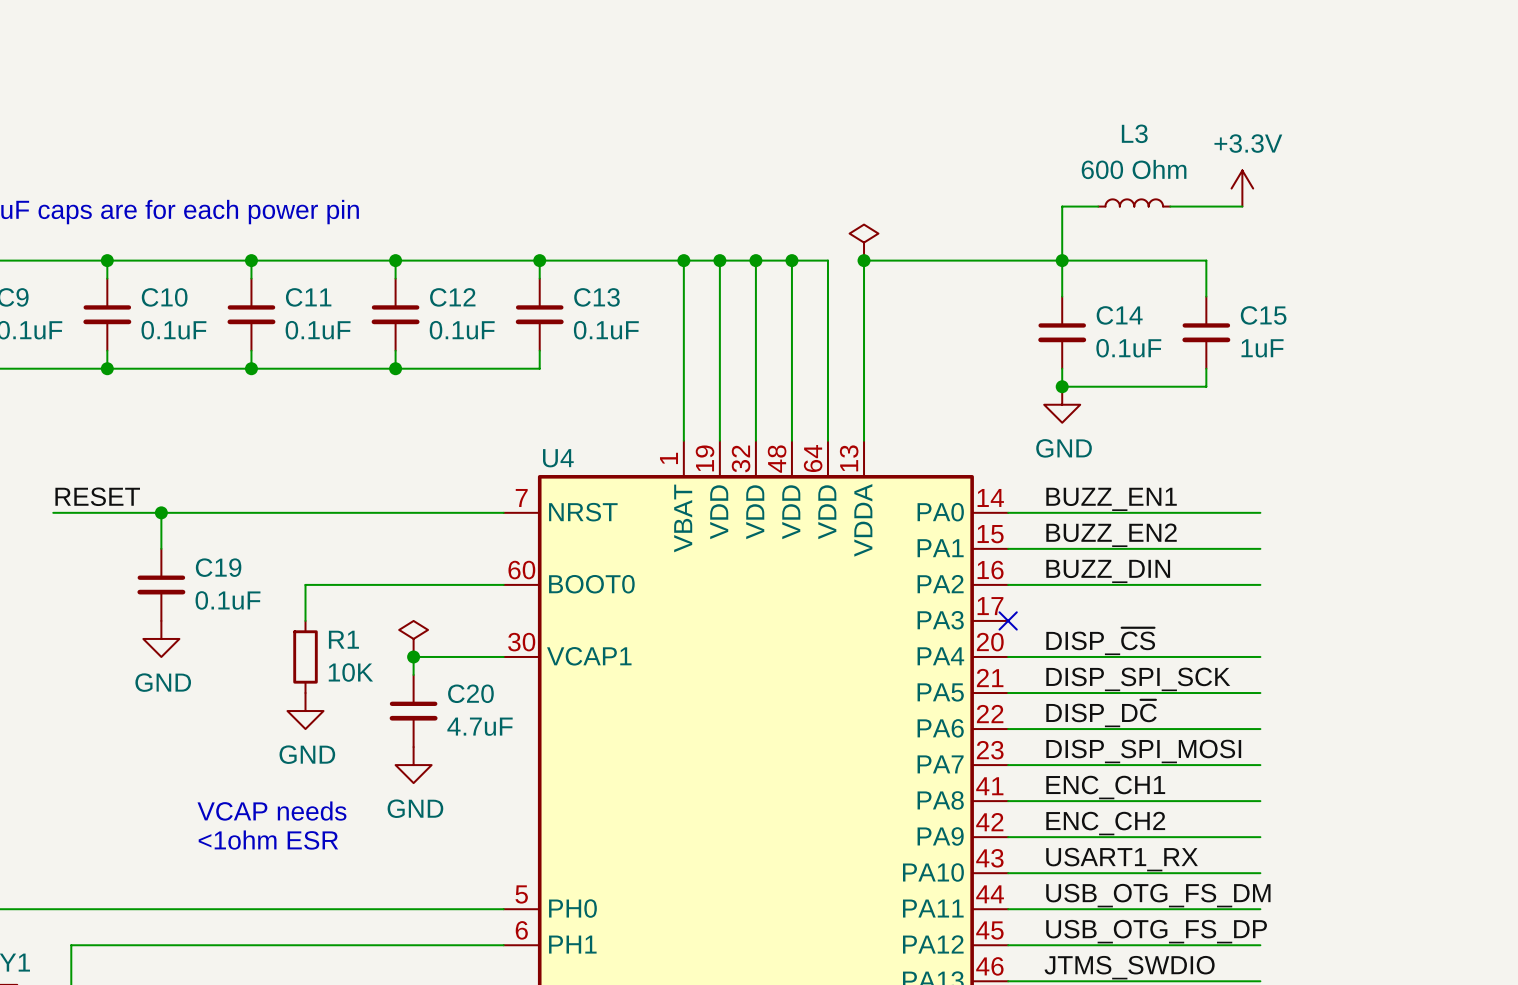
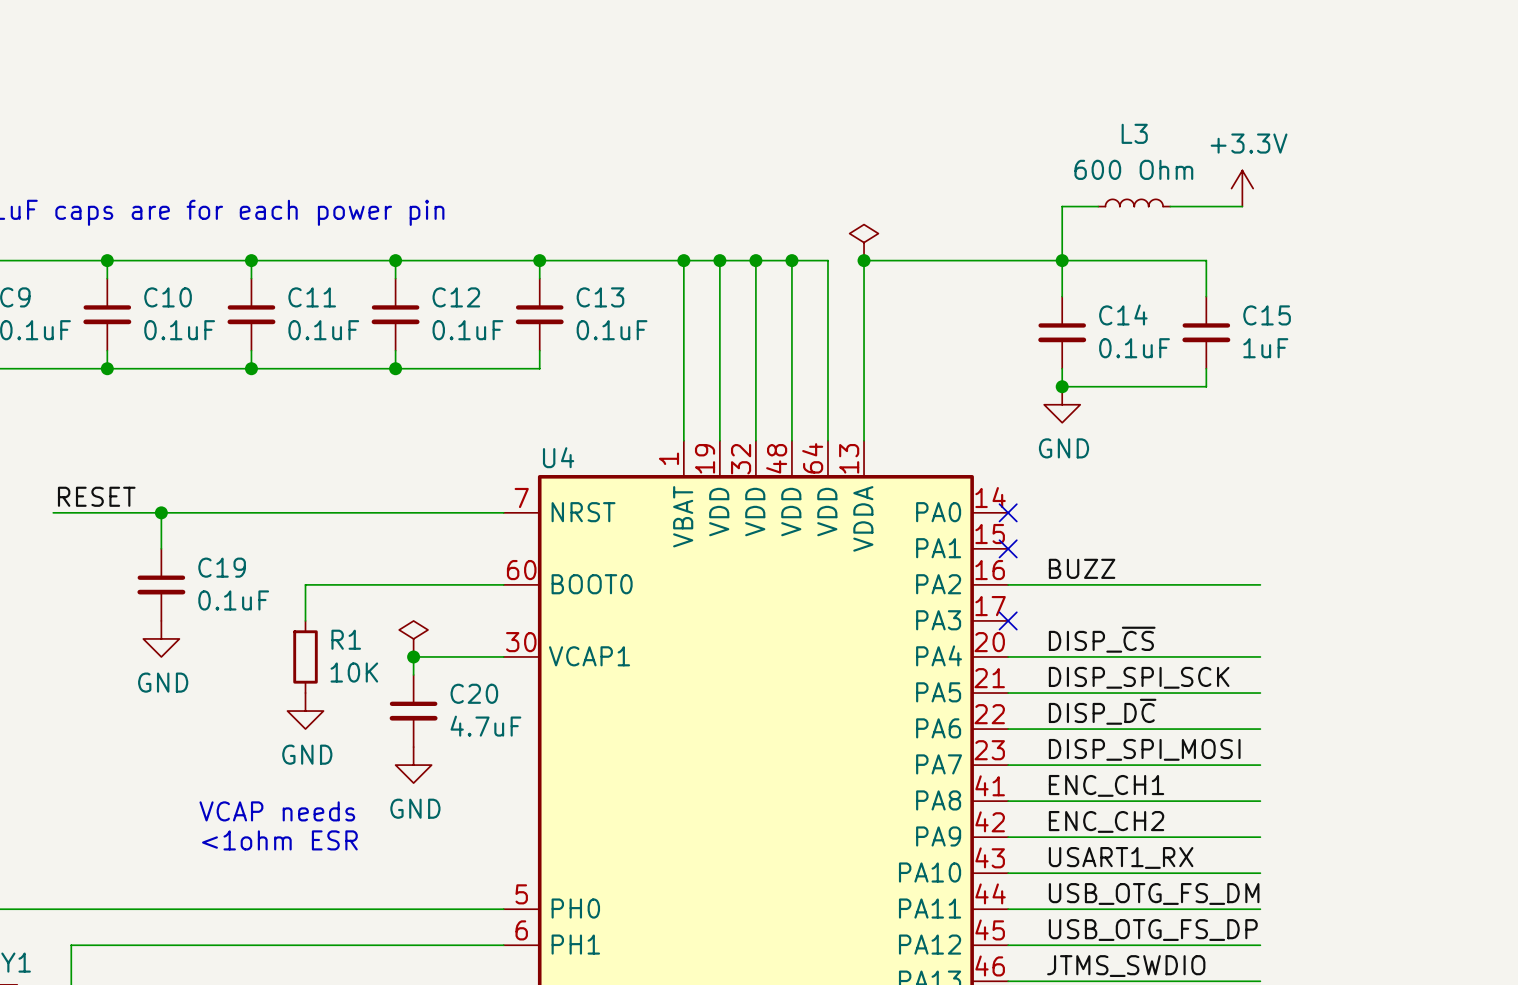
label: BUZZ_EN1 (1111, 499) -> none
wire: (1008, 512) (1260, 512) -> none
no-connect mark: none -> (1008, 512)
label: BUZZ_EN2 (1111, 535) -> none
wire: (1008, 548) (1260, 548) -> none
no-connect mark: none -> (1008, 548)
label: BUZZ_DIN (1108, 571) -> BUZZ (1082, 568)

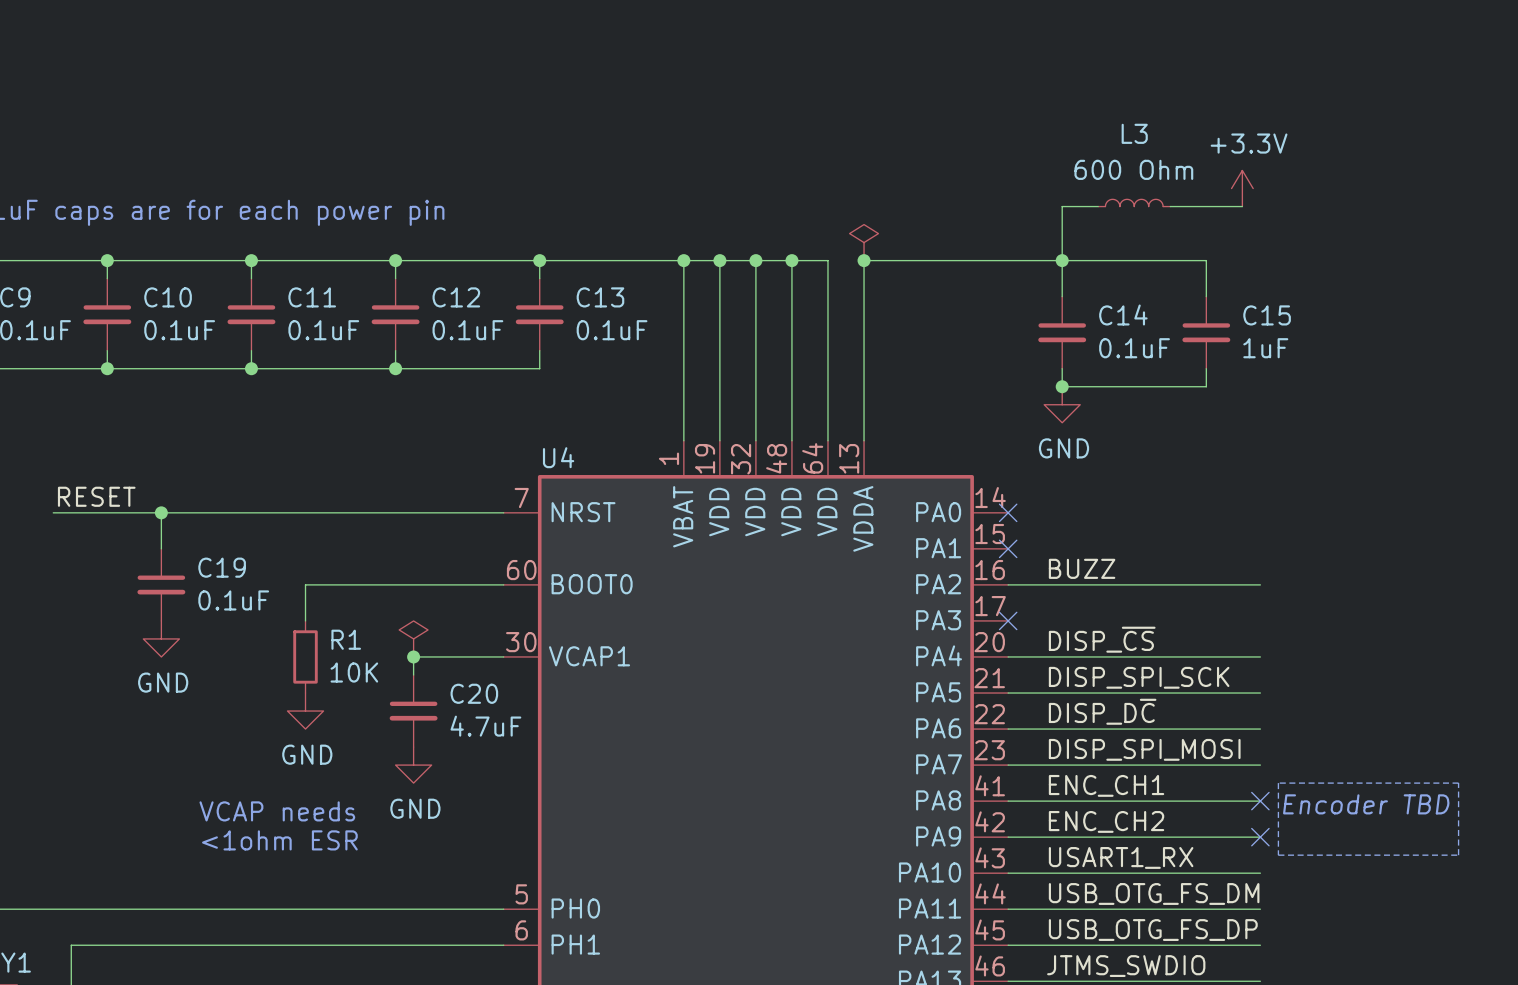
line: none -> (1278, 783) (1278, 855) (1458, 855) (1458, 783) (1278, 783)
no-connect mark: none -> (1260, 801)
text: none -> Encoder TBD (1366, 804)
no-connect mark: none -> (1260, 837)

